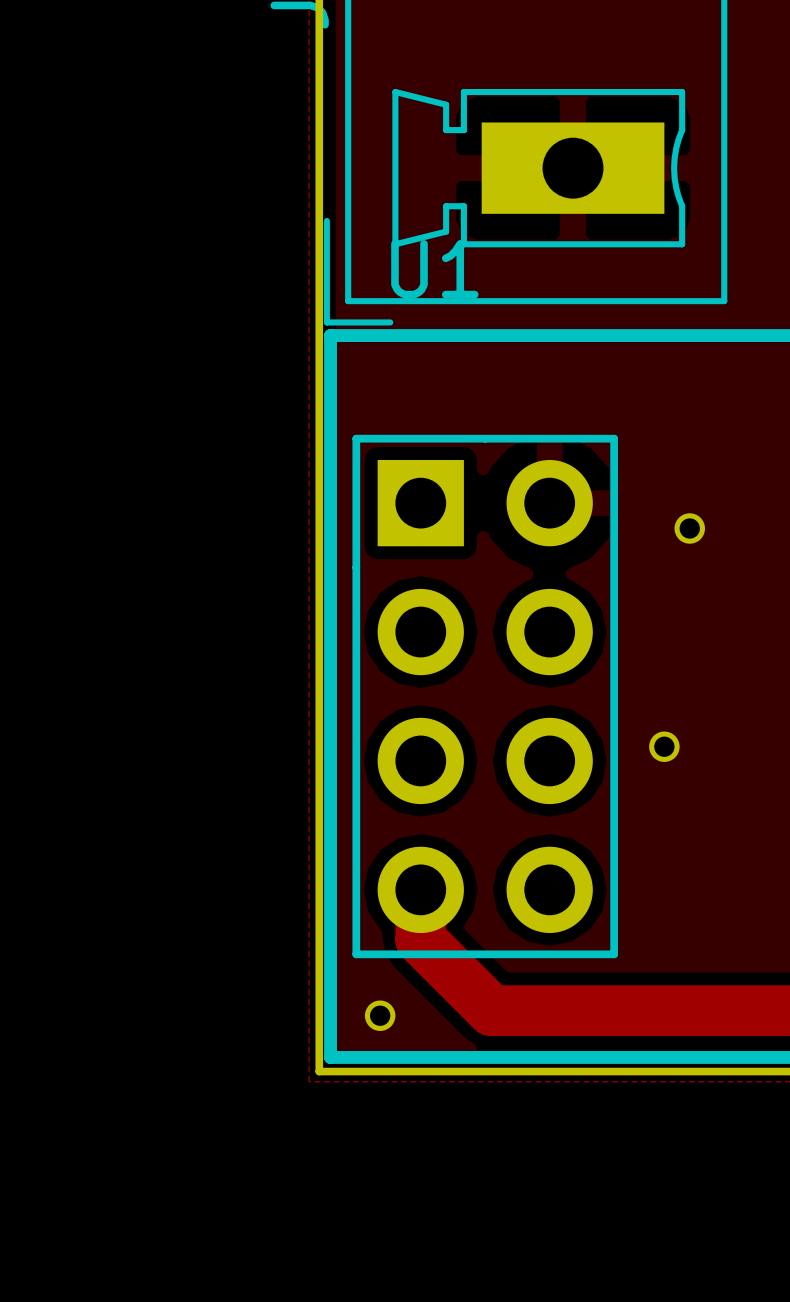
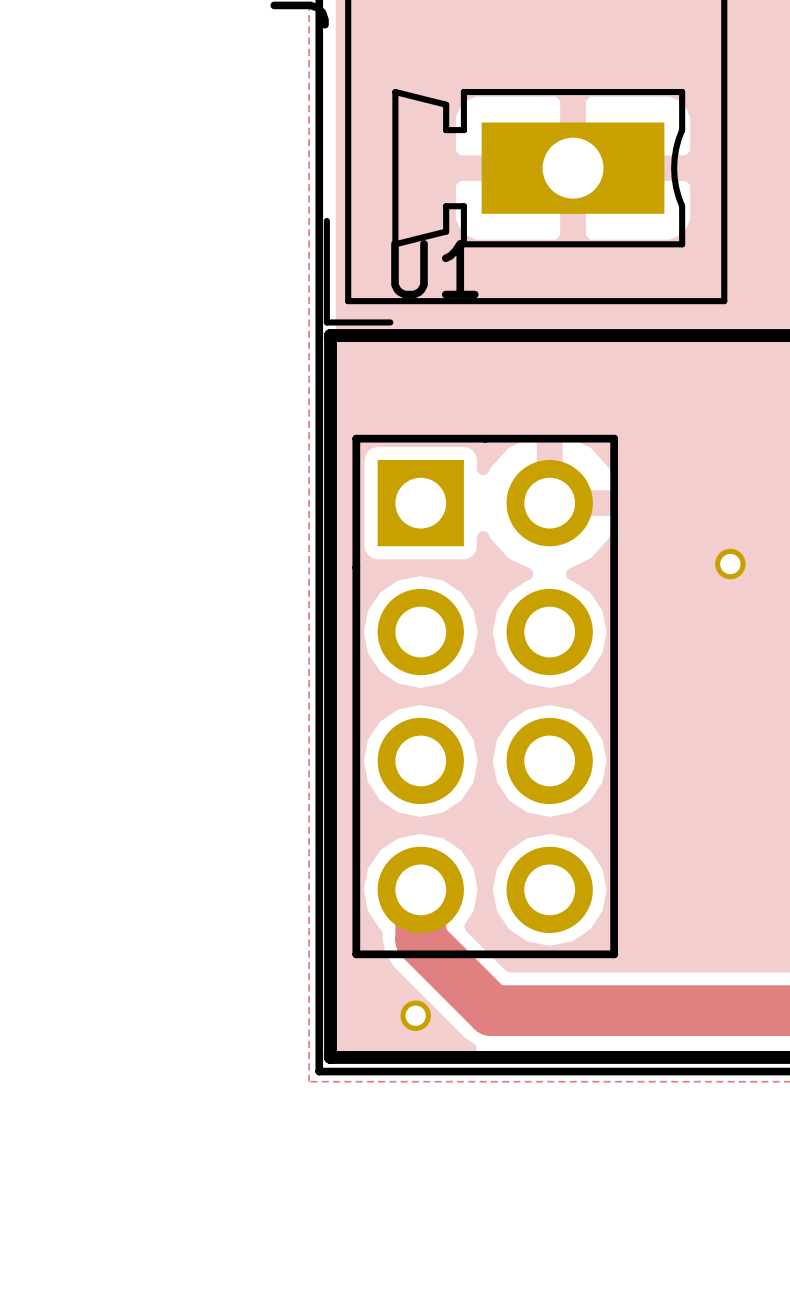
part position: (689, 528) -> (730, 564)
part: (664, 746) -> none
part position: (380, 1015) -> (415, 1015)

